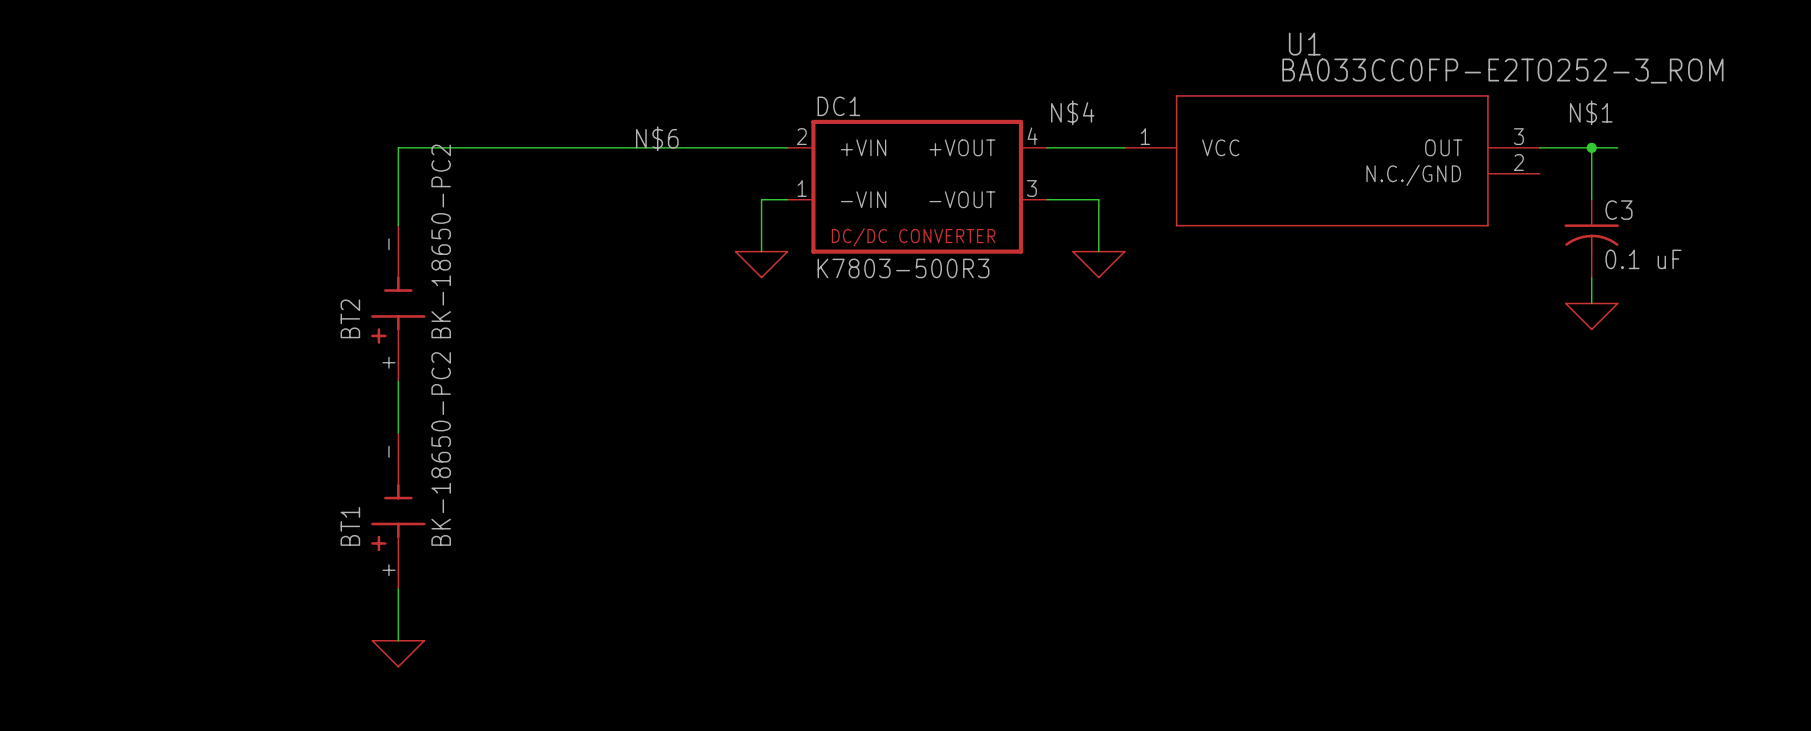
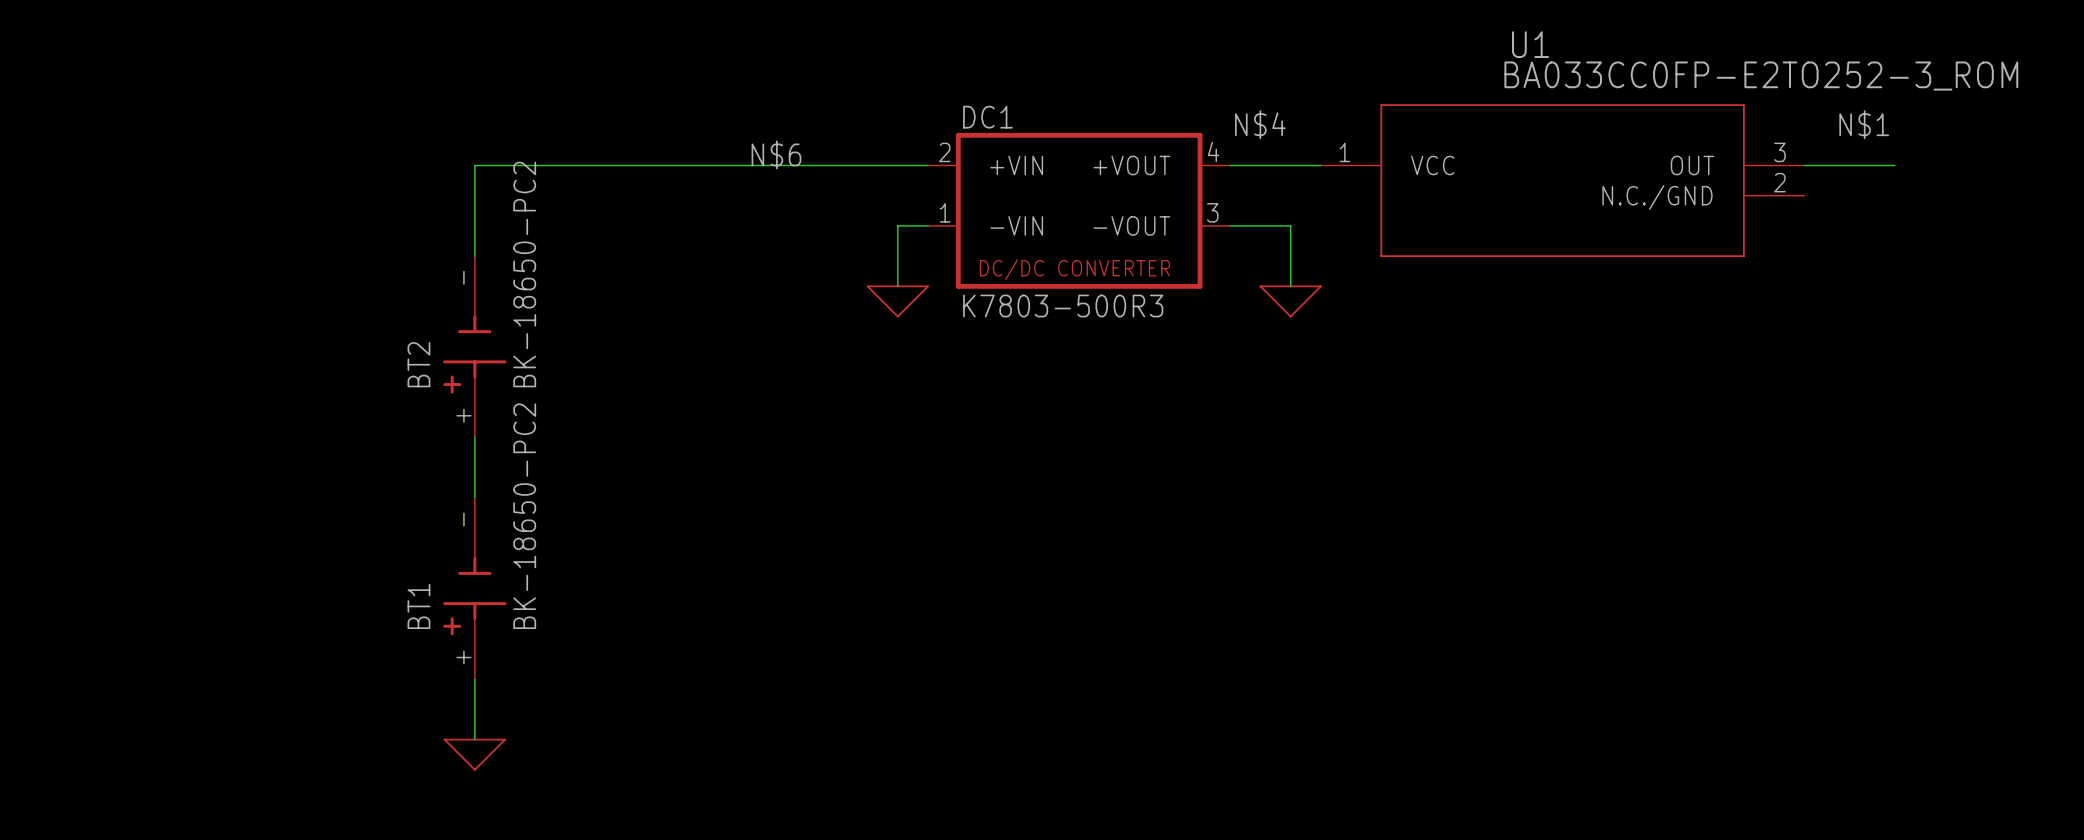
wire: (1591, 147) (1591, 199) -> none
junction: (1591, 147) -> none
C3: 0.1 uF (1591, 238) -> none
wire: (1591, 277) (1591, 303) -> none
power symbol: (1591, 316) -> none

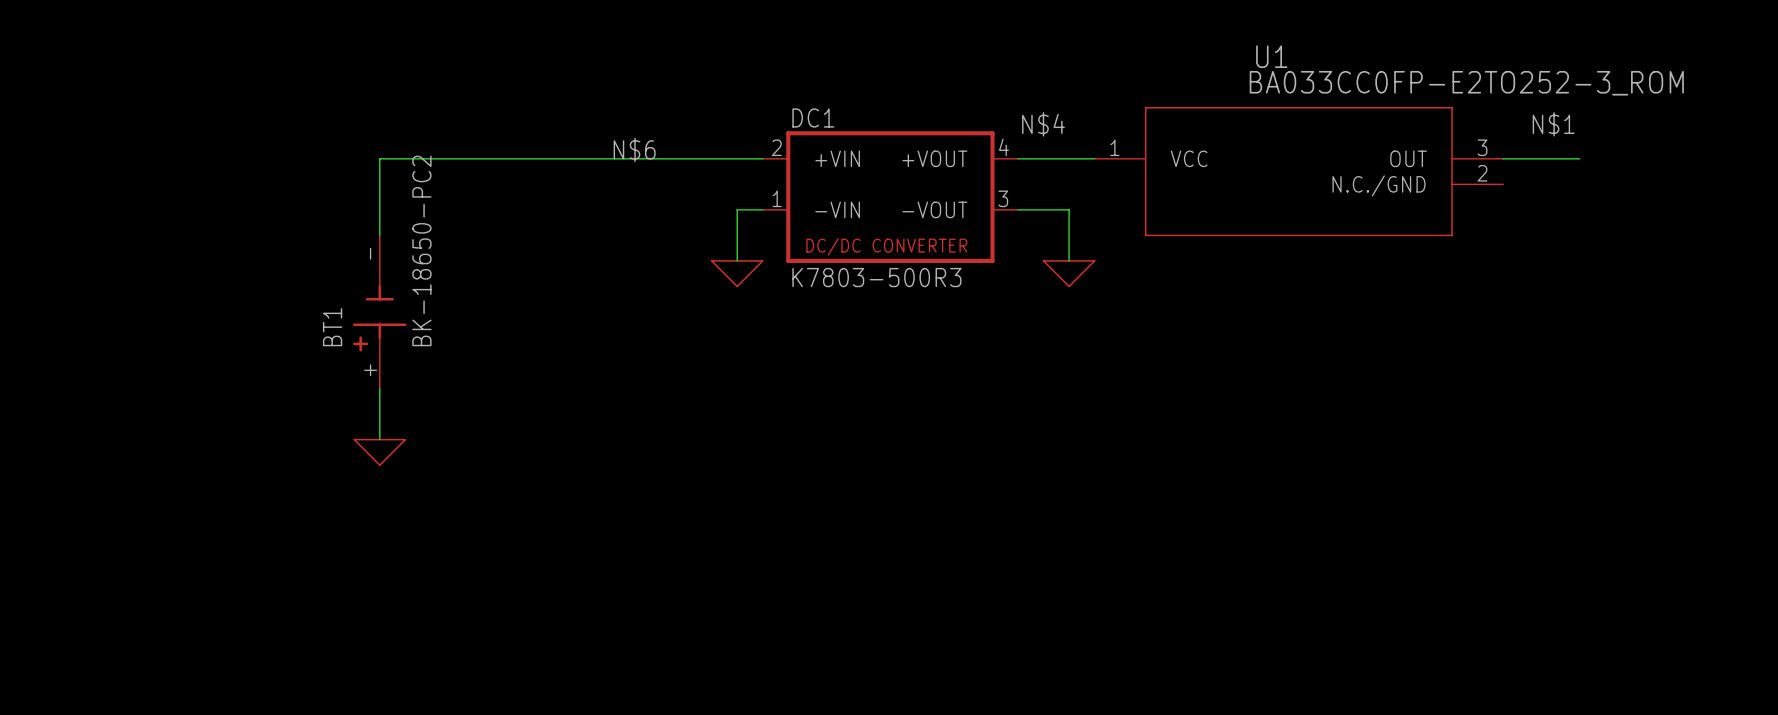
BT2 name: BT2 (418, 364) -> BT1 (332, 327)
BT1: BK-18650-PC2 (474, 588) -> none
wire: (474, 679) (474, 739) -> none
power symbol position: (474, 754) -> (379, 452)

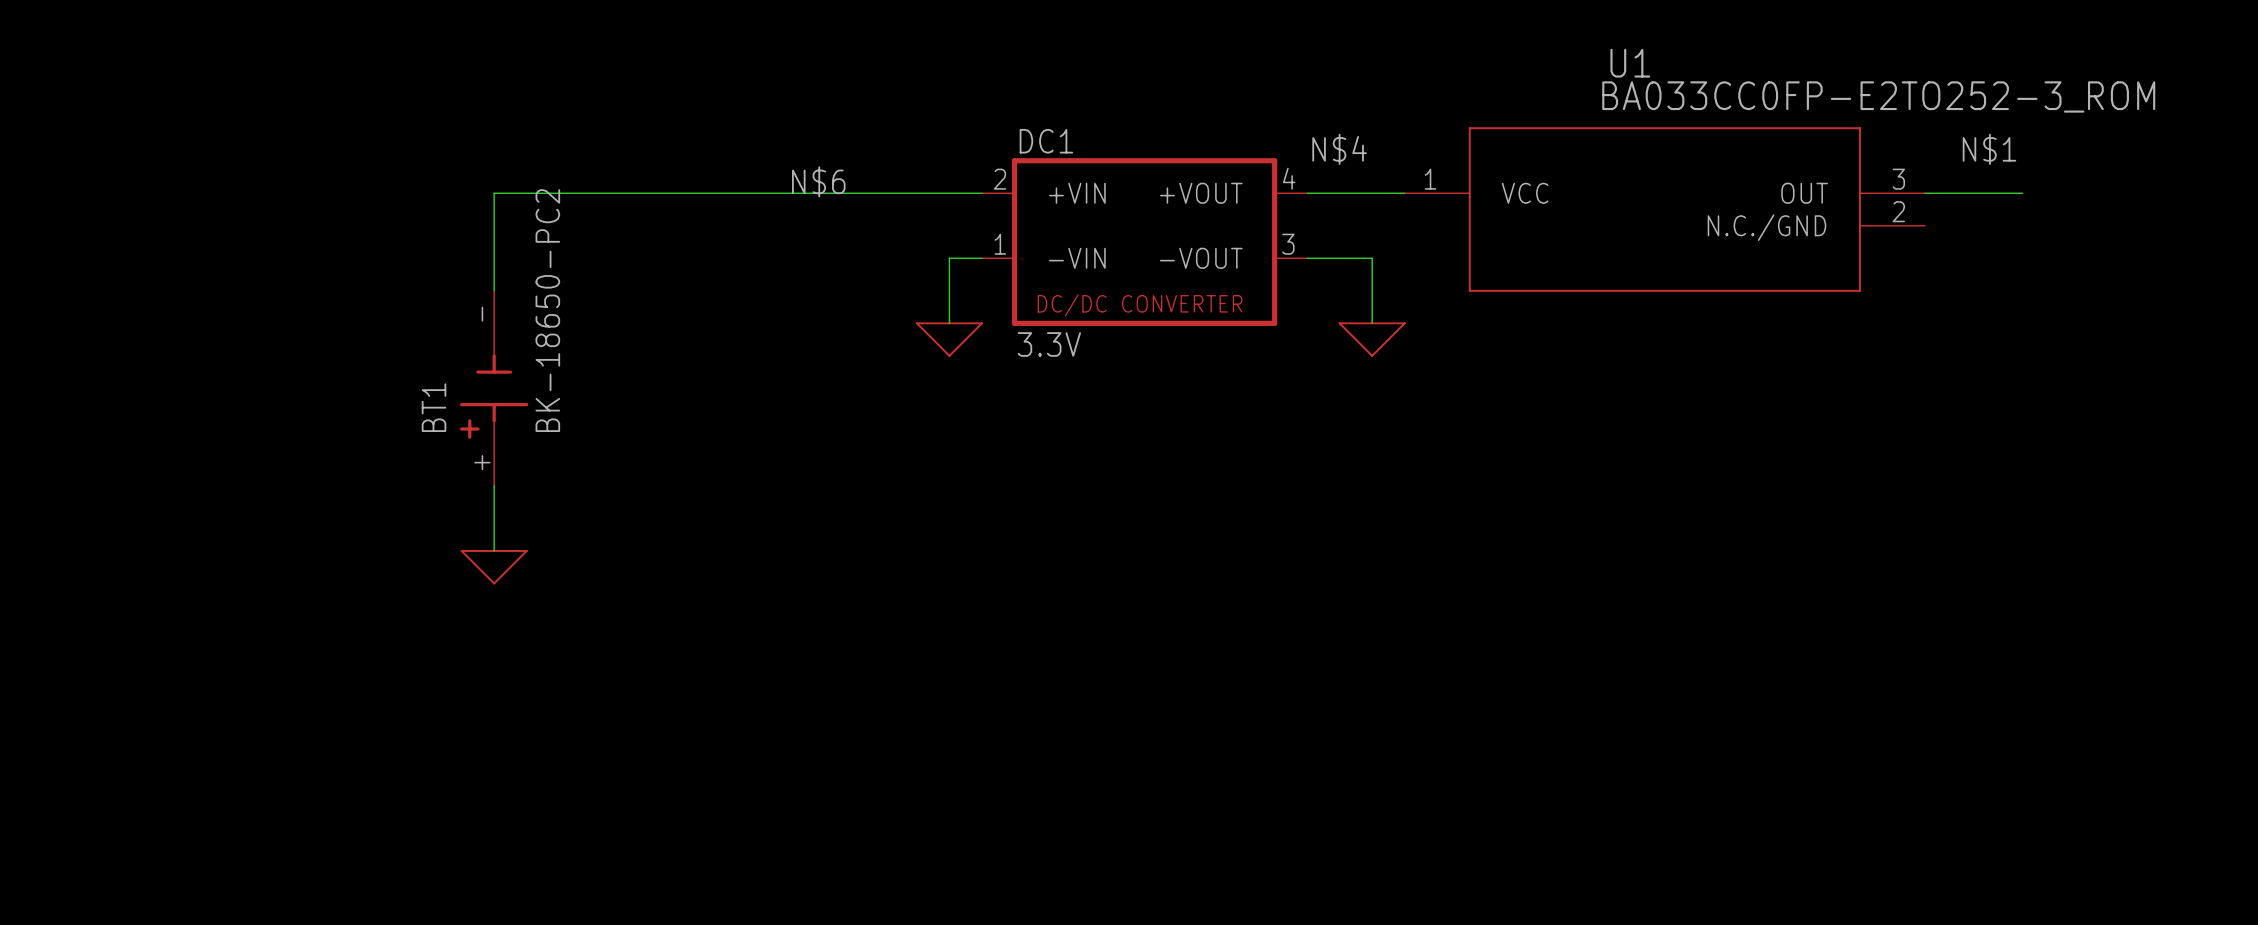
DC1 value: K7803-500R3 (876, 277) -> 3.3V (1049, 344)

